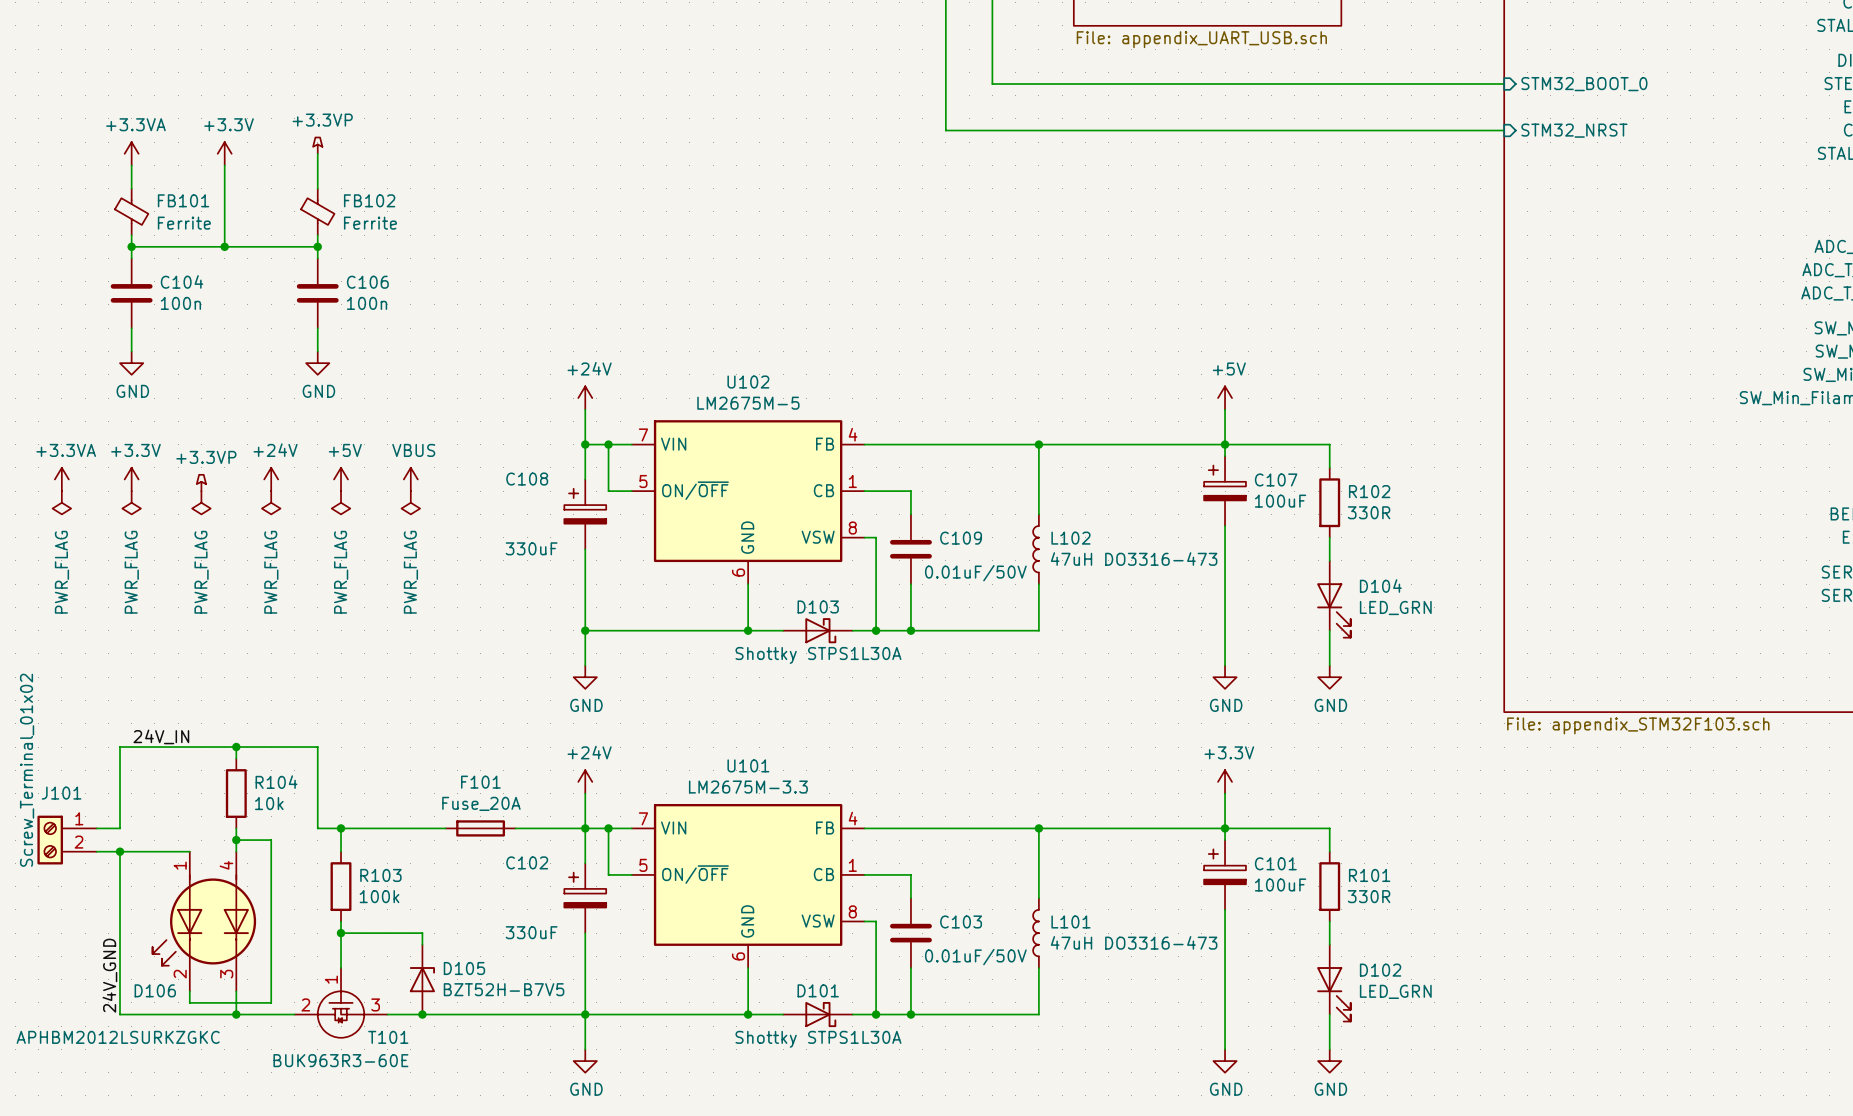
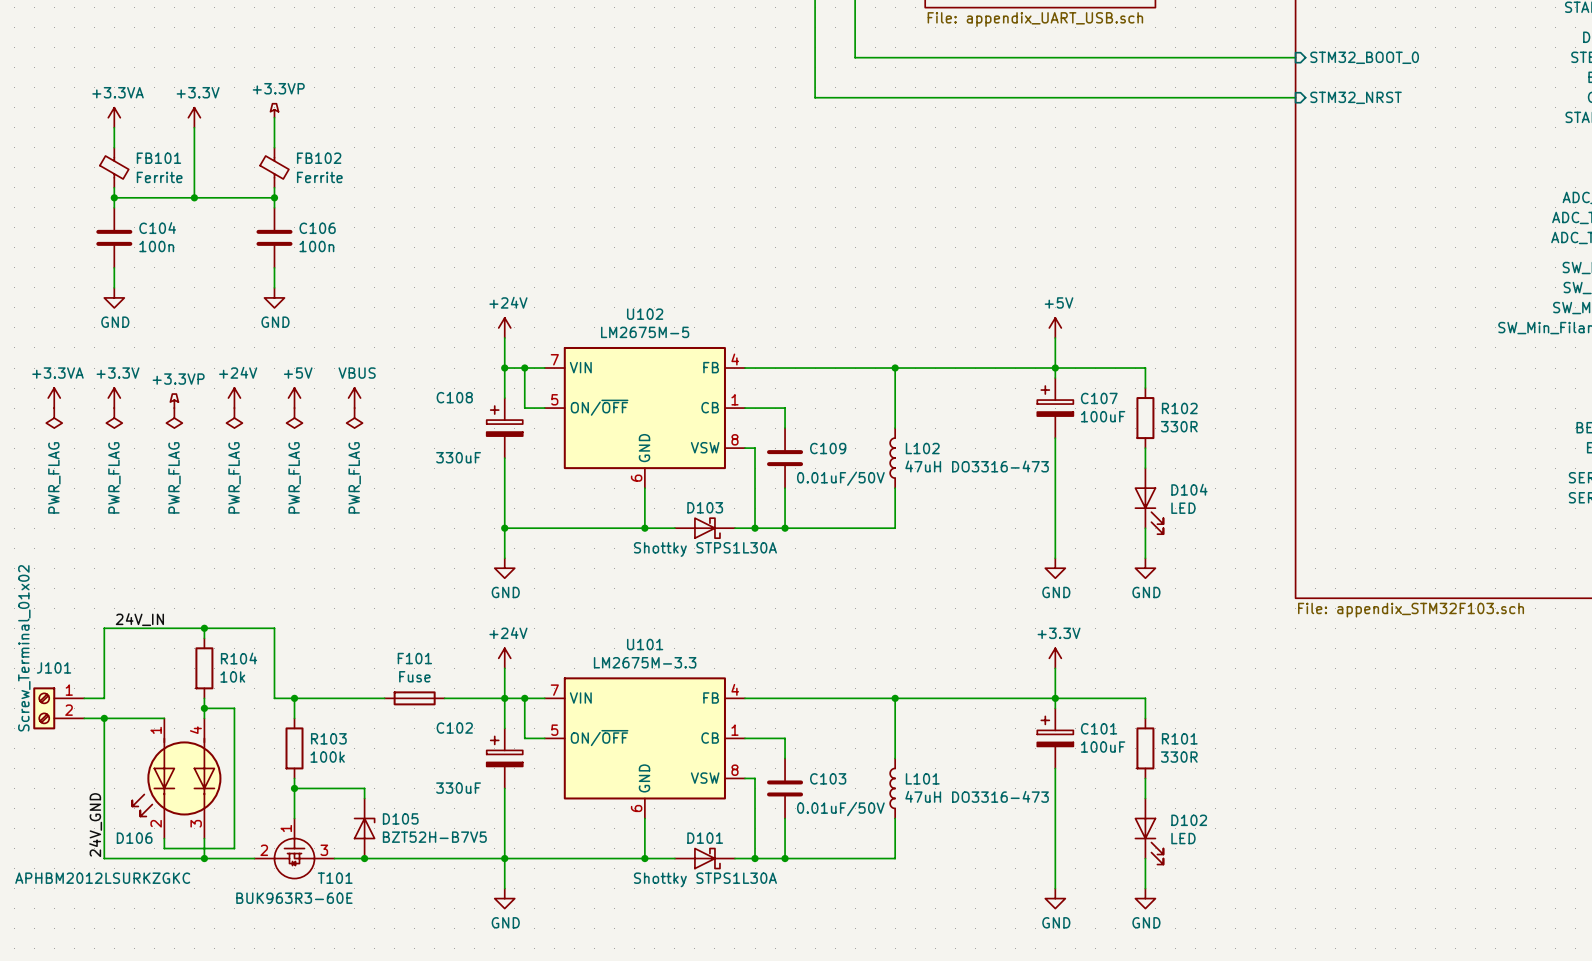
D104 value: LED_GRN (1395, 608) -> LED (1183, 508)
F101 value: Fuse_20A (481, 803) -> Fuse (414, 676)
D102 value: LED_GRN (1395, 991) -> LED (1183, 838)

